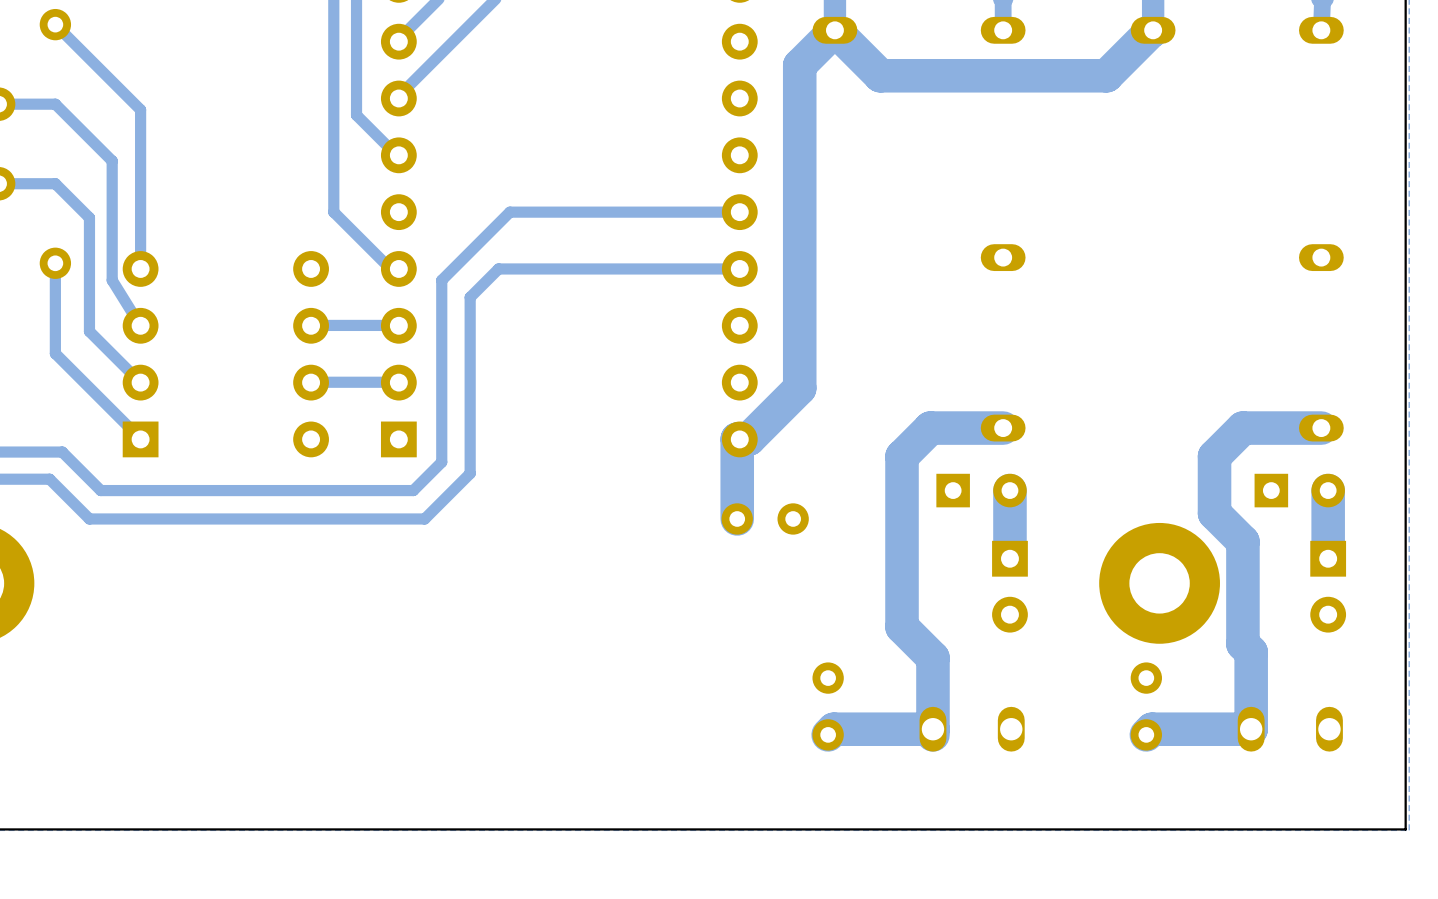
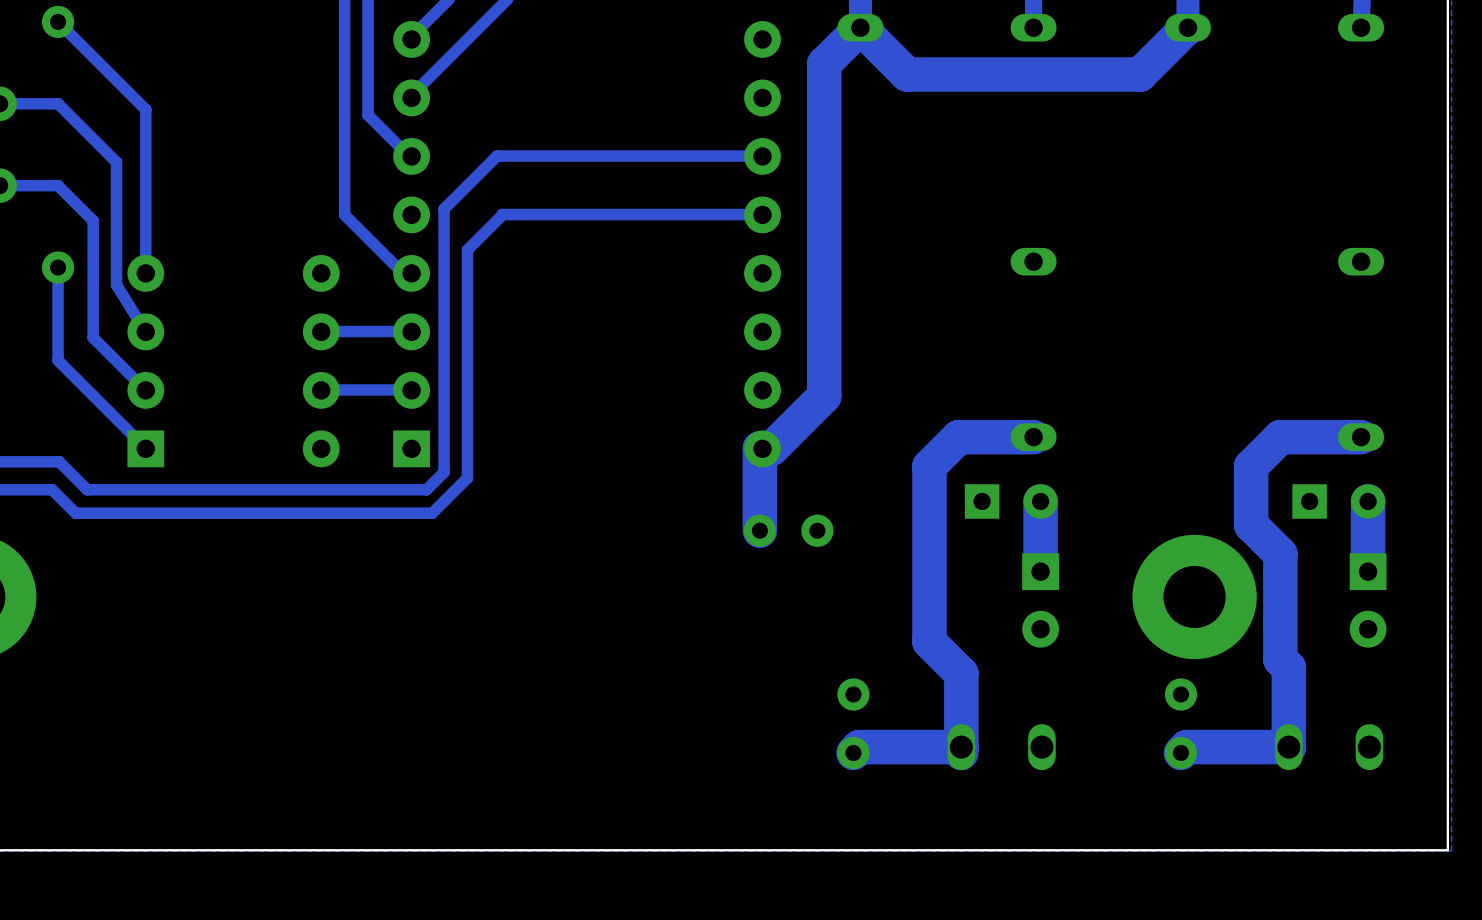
track: (739, 212) (509, 212) (441, 280) (441, 462) (413, 490) (100, 490) (62, 452) (56, 452) -> (759, 156) (497, 156) (444, 209) (444, 472) (426, 489) (87, 489) (59, 461)
track: (739, 268) (498, 268) (470, 297) (470, 473) (424, 518) (89, 518) (72, 501) -> (759, 214) (502, 214) (467, 250) (467, 478) (432, 513) (75, 513)

